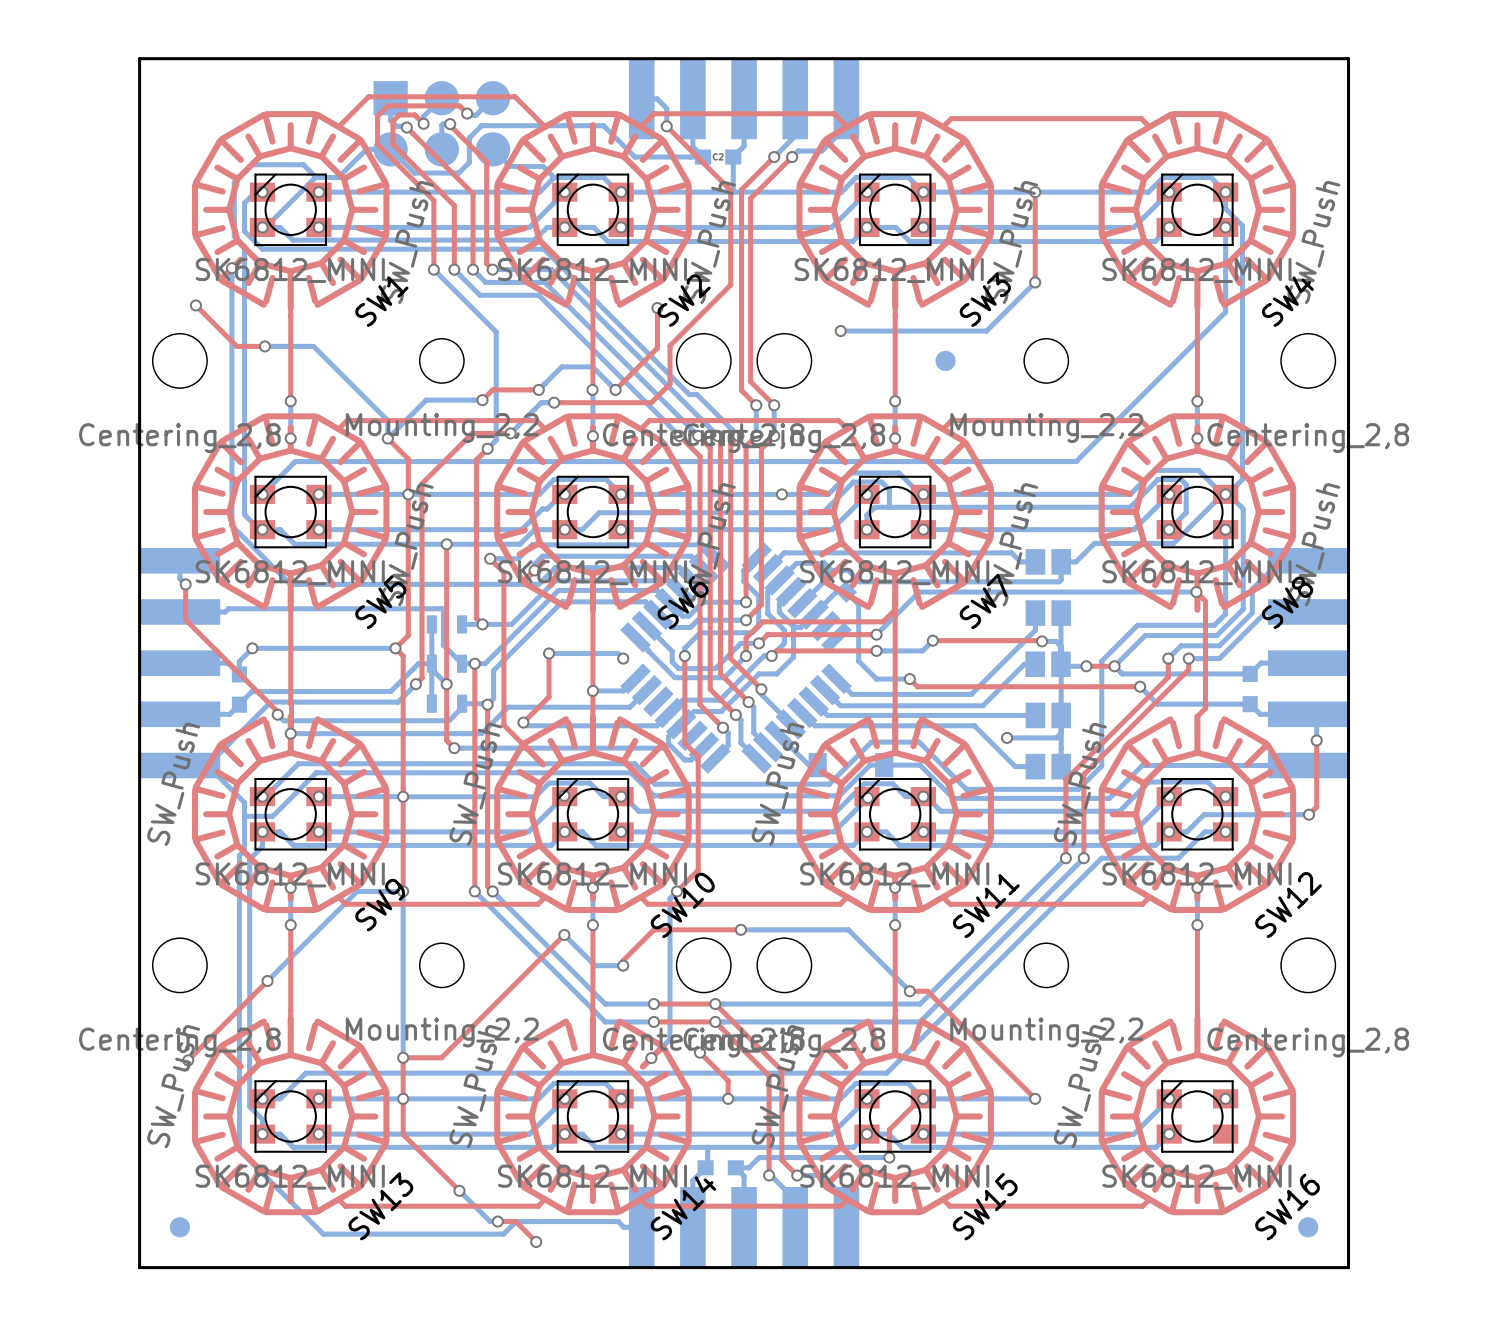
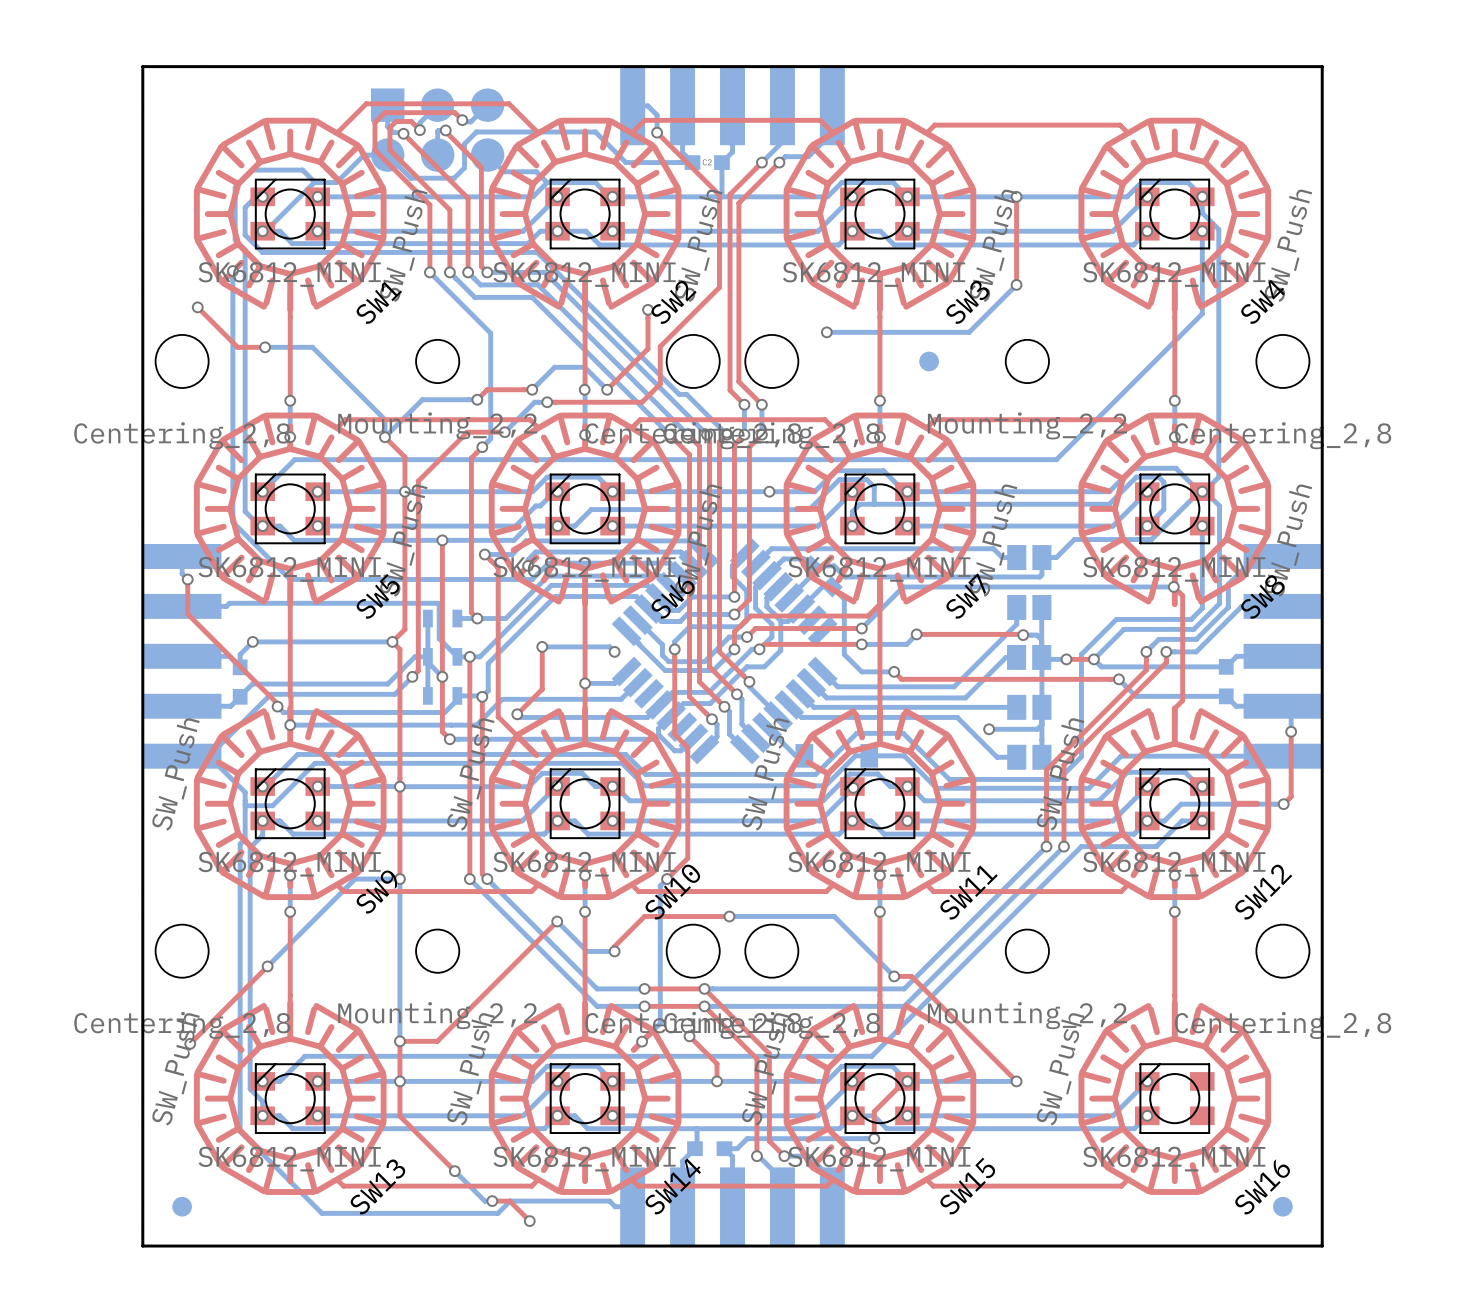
via: (1225, 1098) -> none

